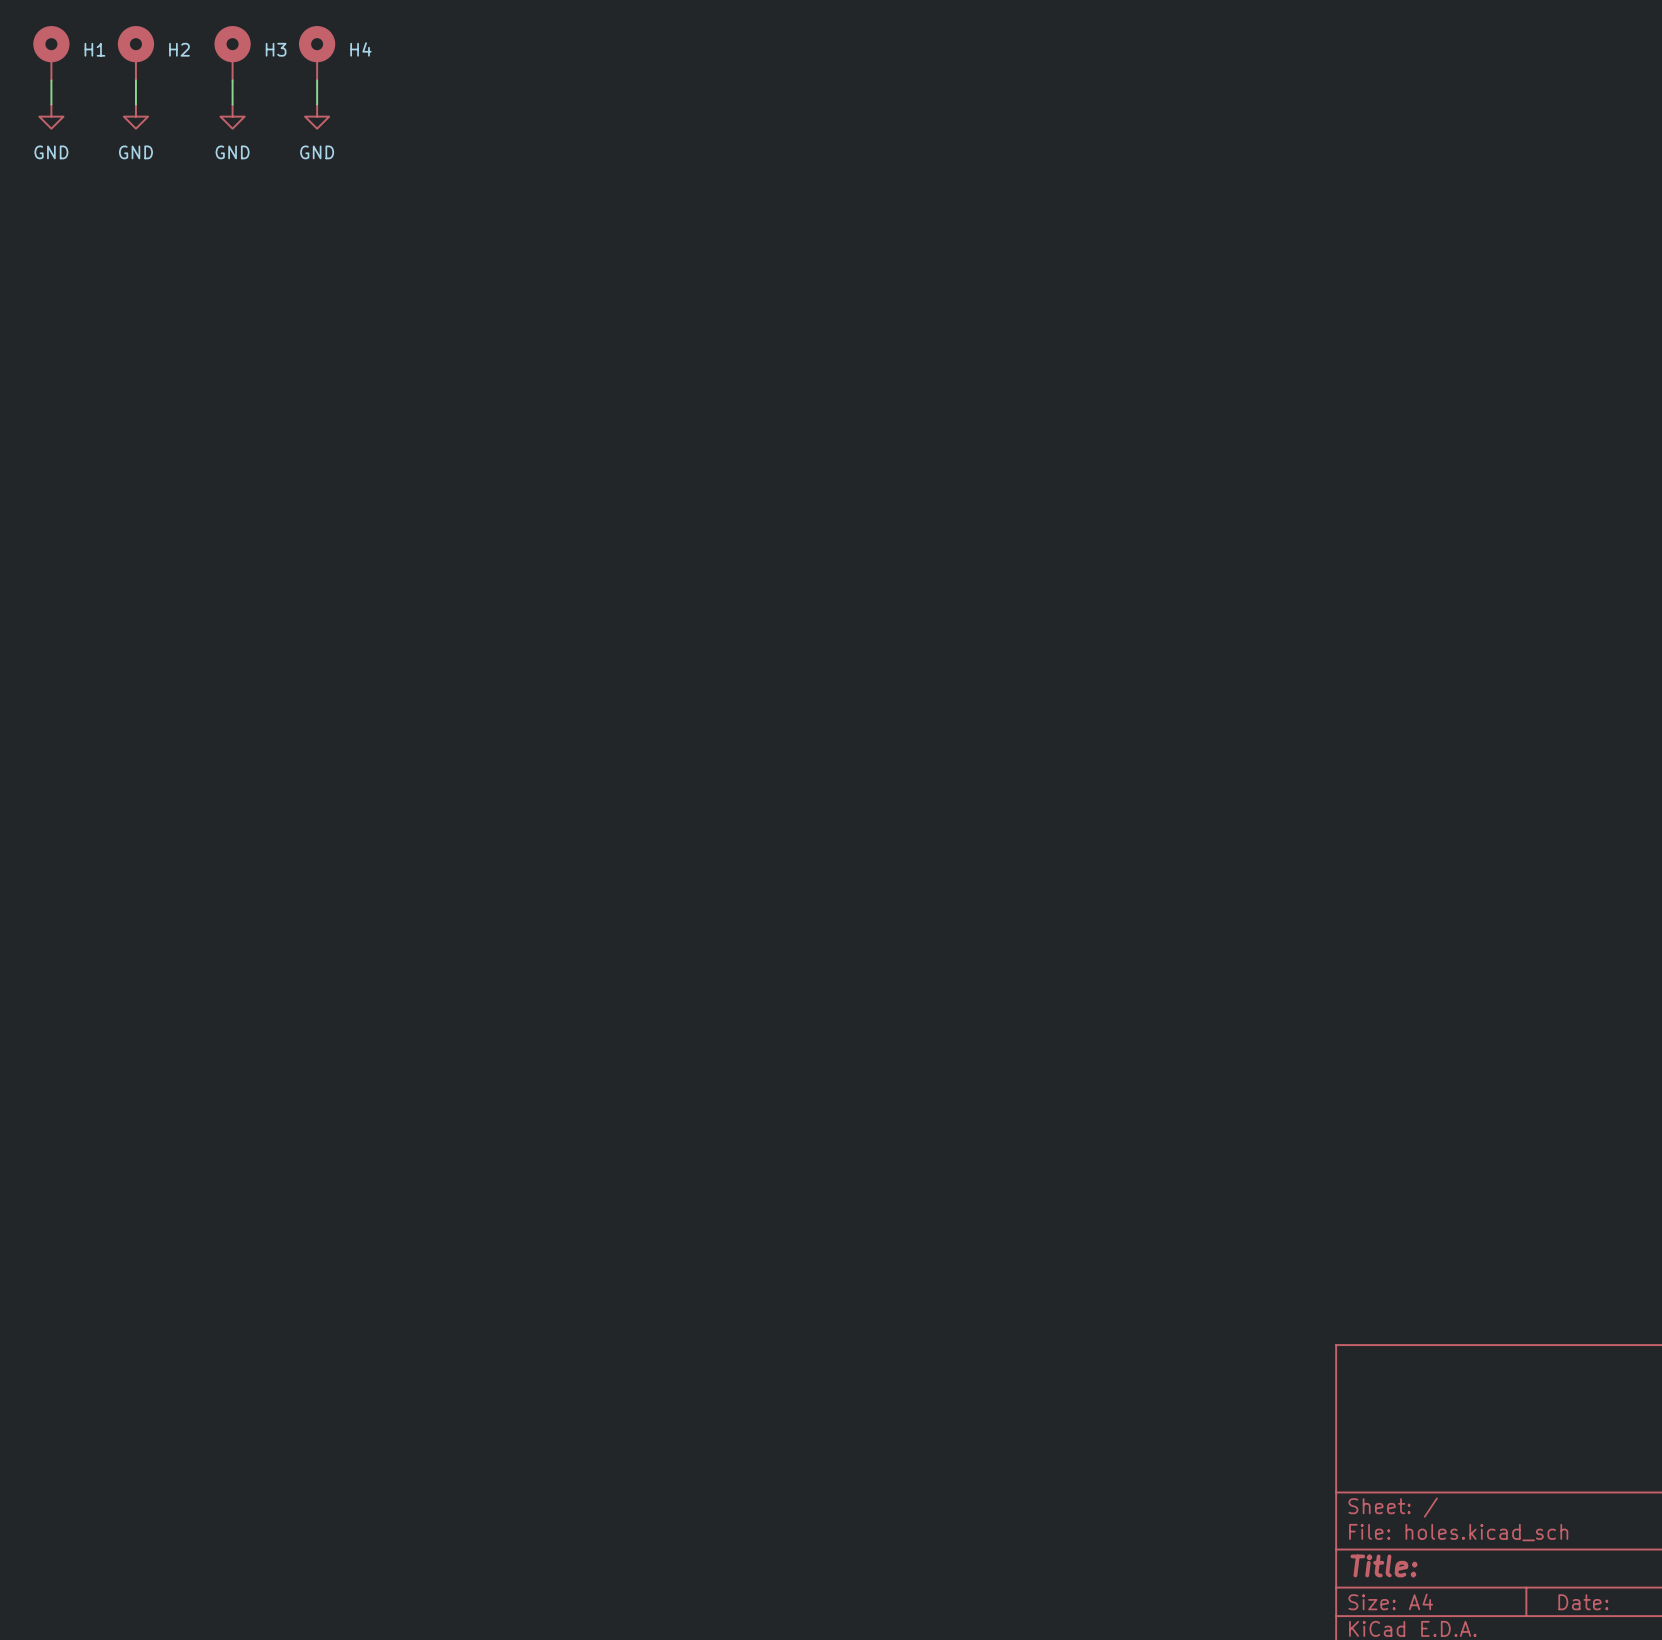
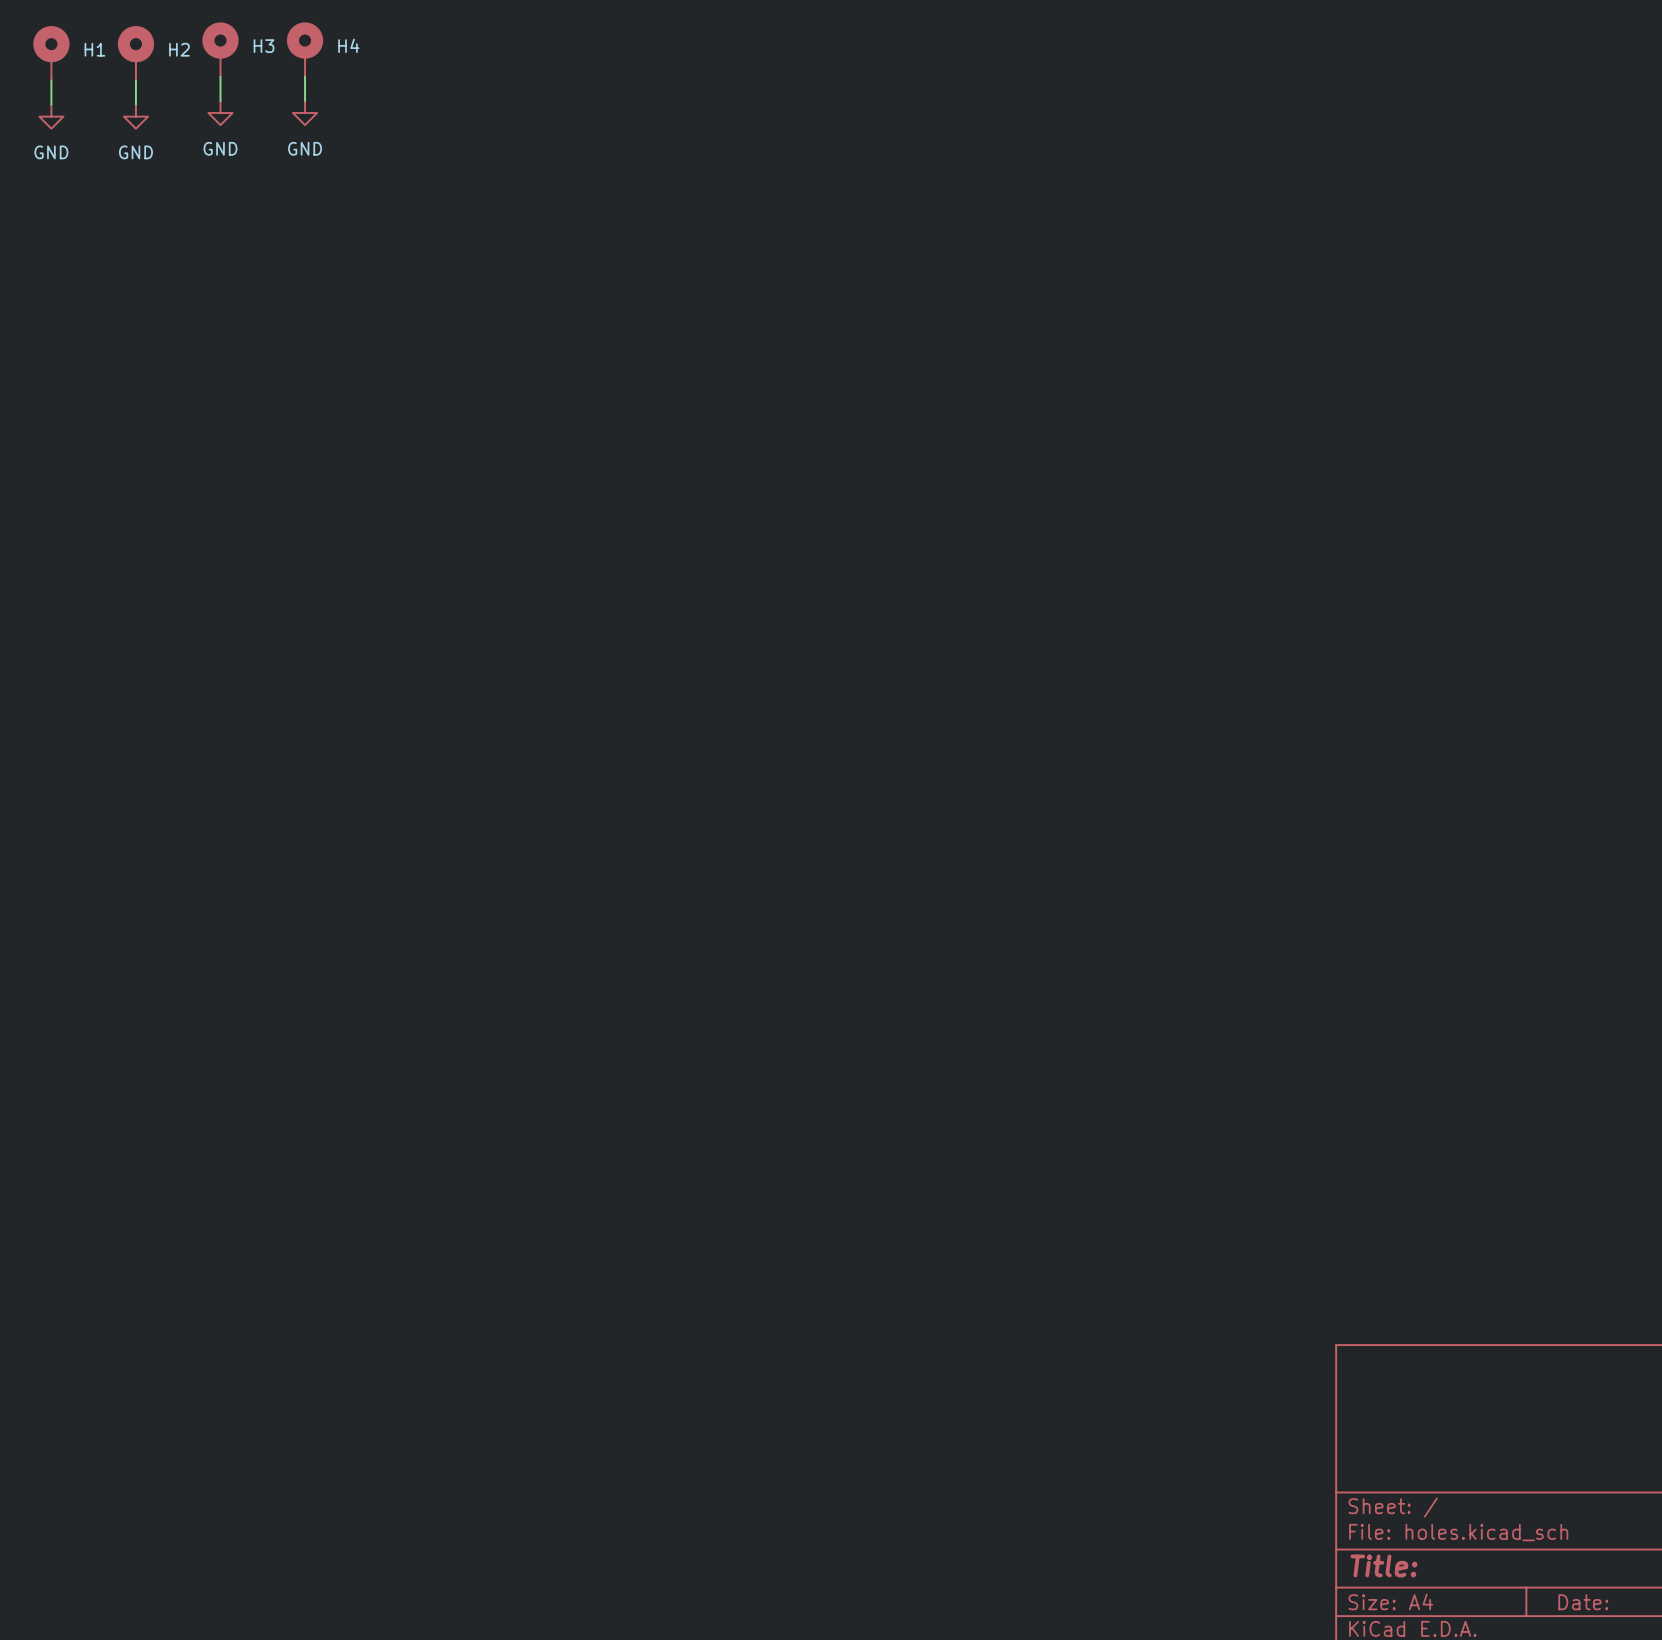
H3 position: (232, 53) -> (220, 49)
H4 position: (317, 53) -> (305, 49)
wire: (232, 80) (232, 104) -> (220, 76) (220, 100)
wire: (317, 80) (317, 104) -> (305, 76) (305, 100)
power symbol position: GND (232, 116) -> GND (220, 113)
power symbol position: GND (317, 116) -> GND (305, 113)

